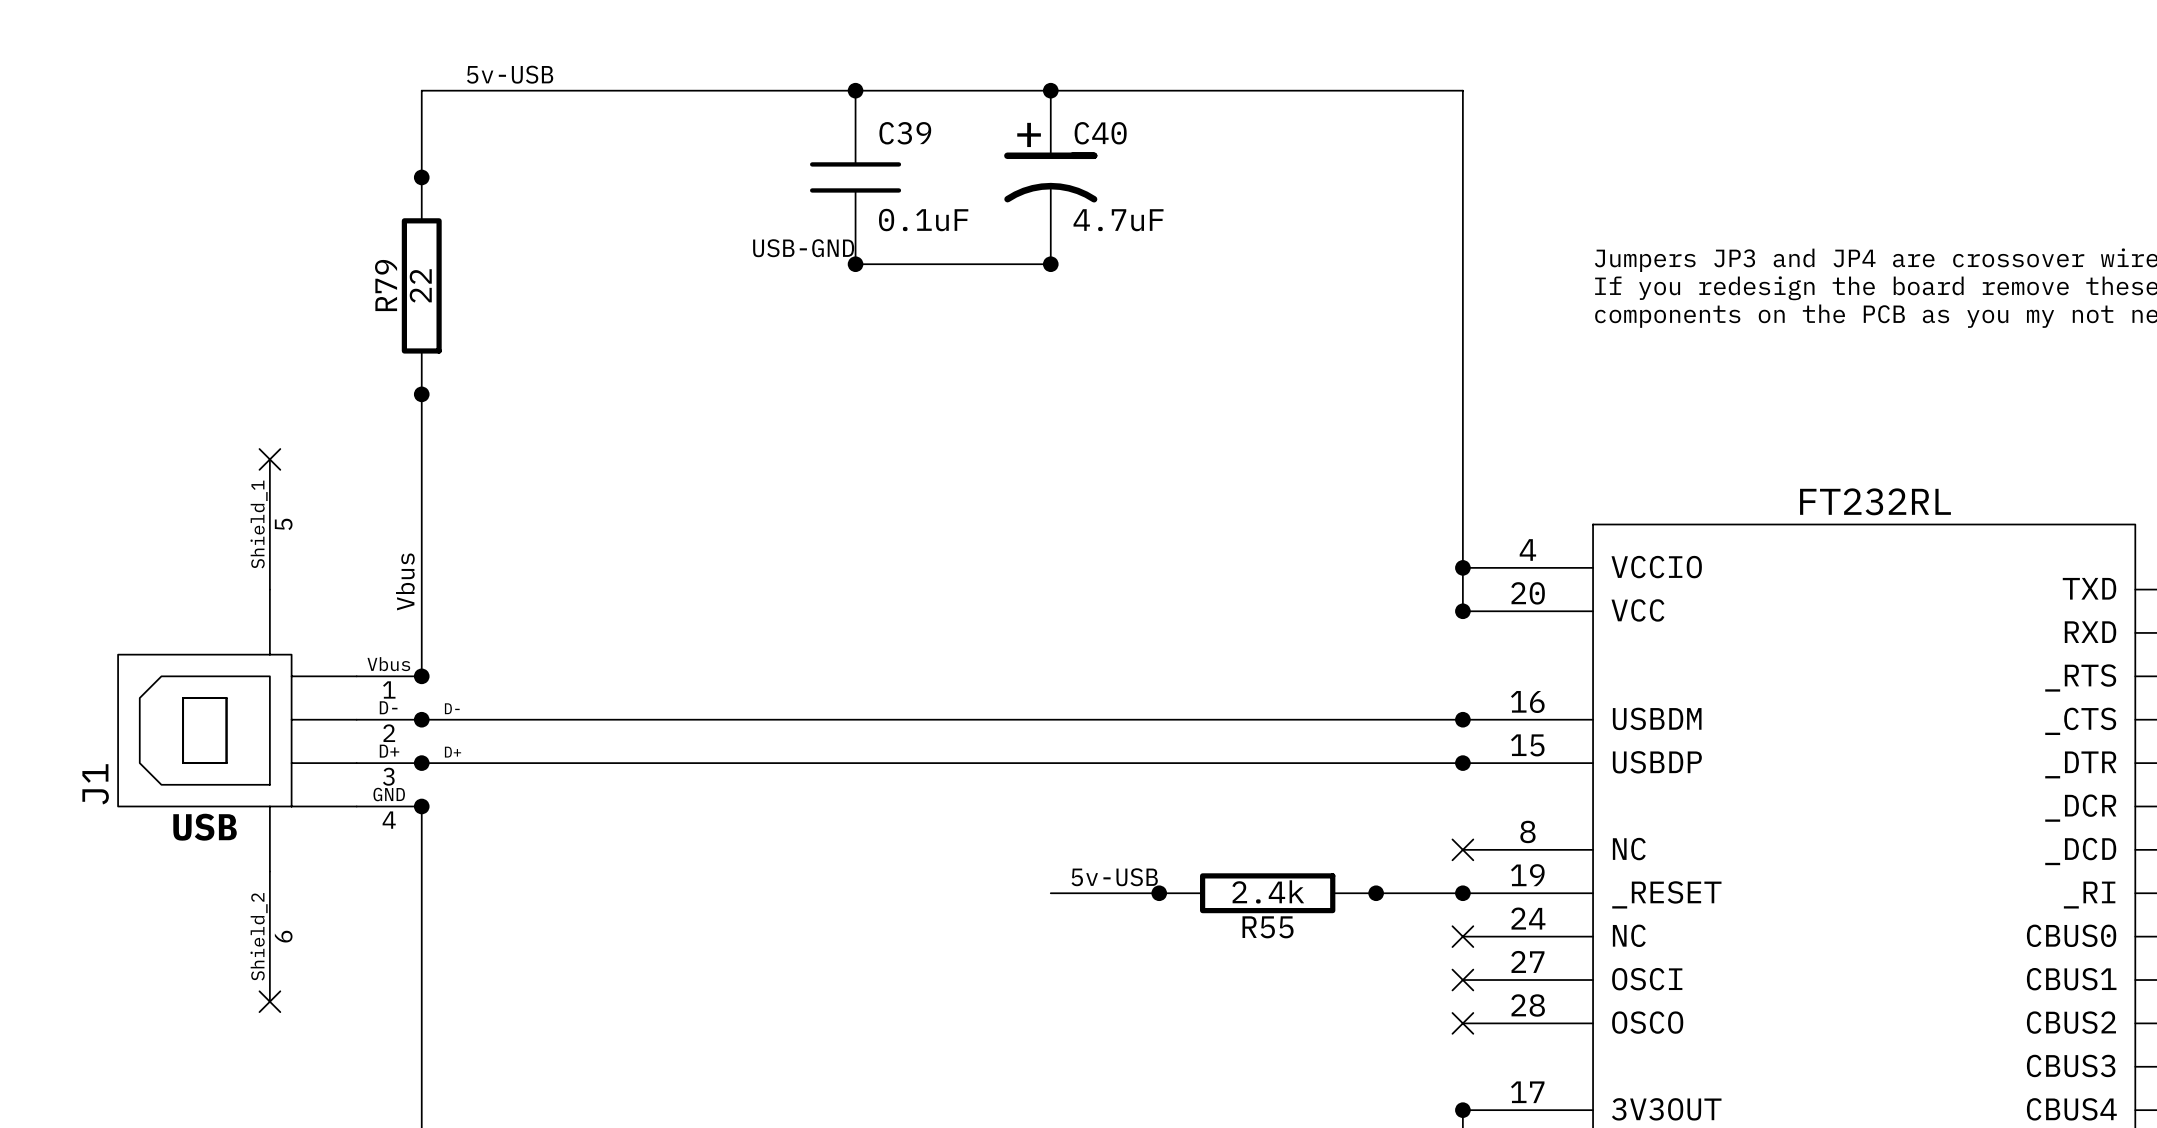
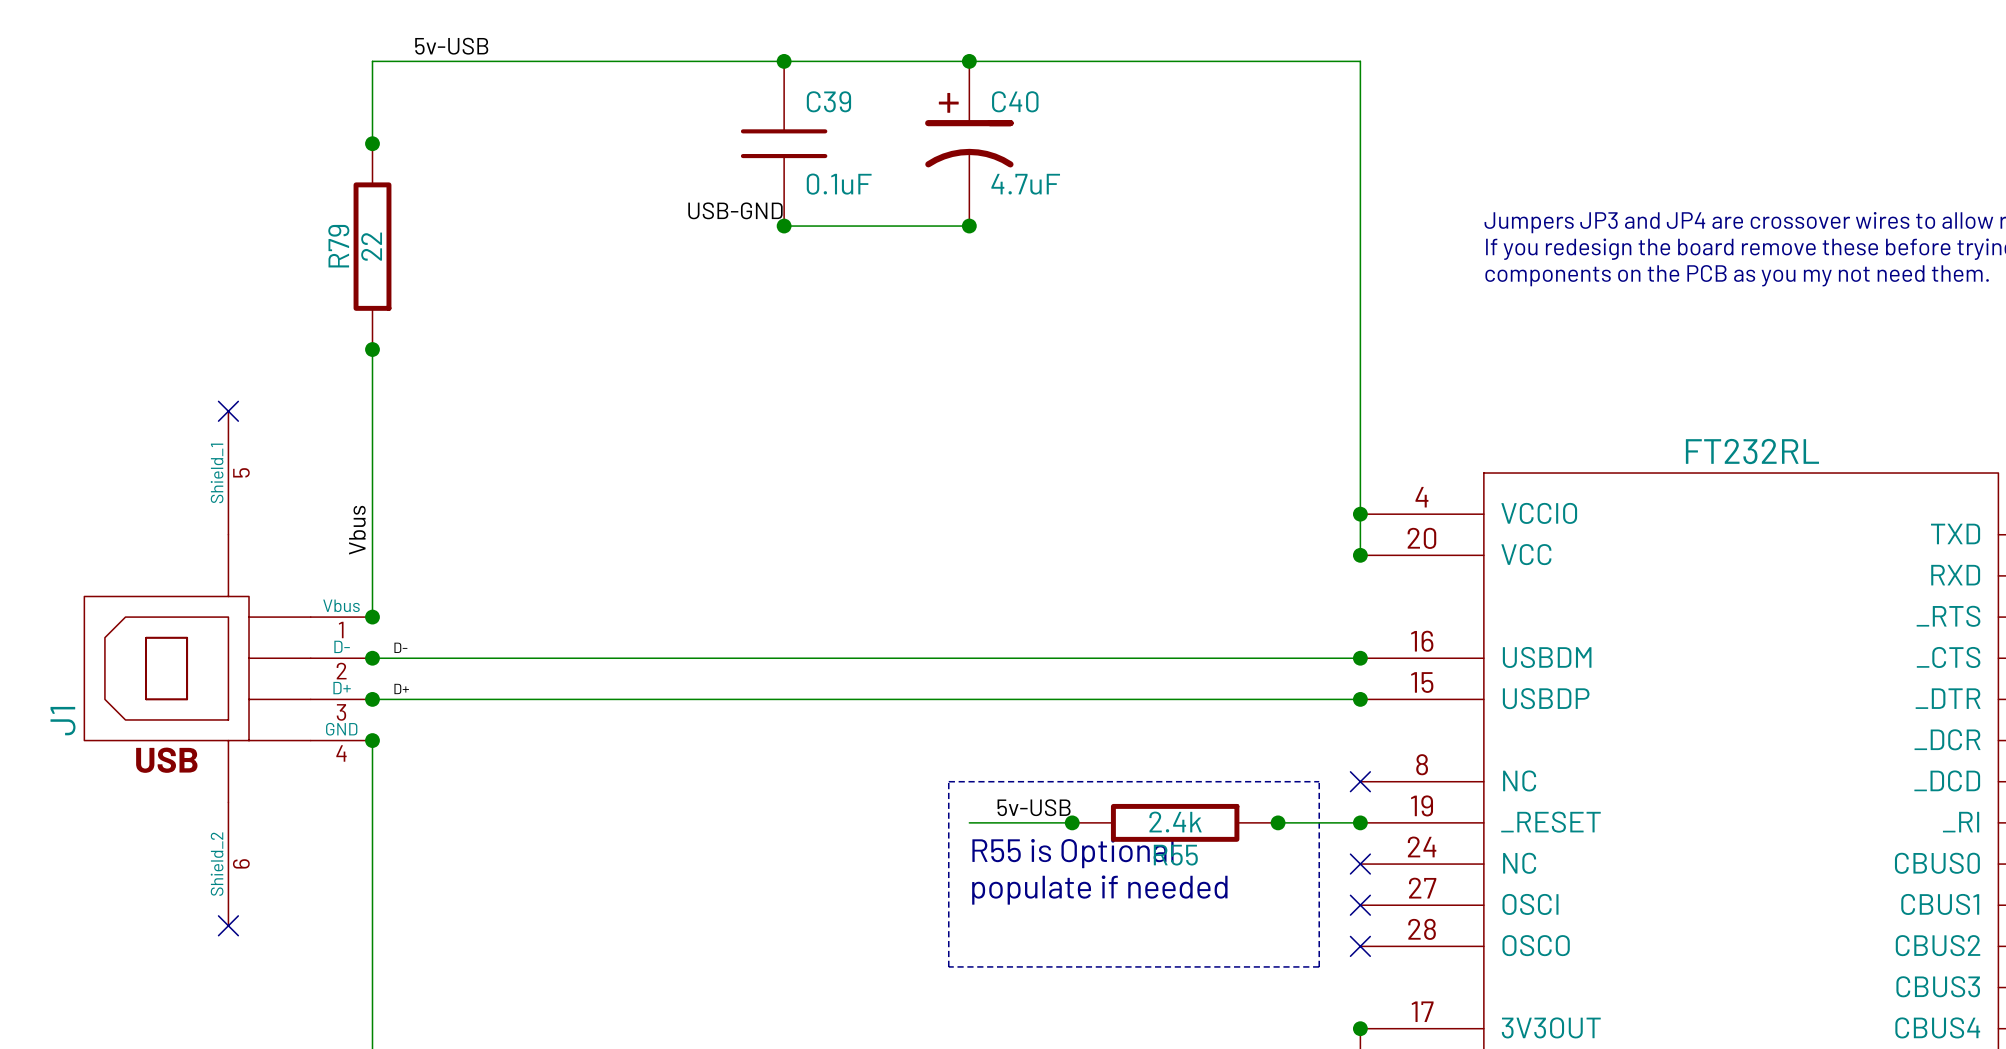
line: none -> (948, 781) (948, 966) (1319, 966) (1319, 781) (948, 781)
text: none -> R55 is Optional (1072, 853)
text: none -> populate if needed (1099, 890)

